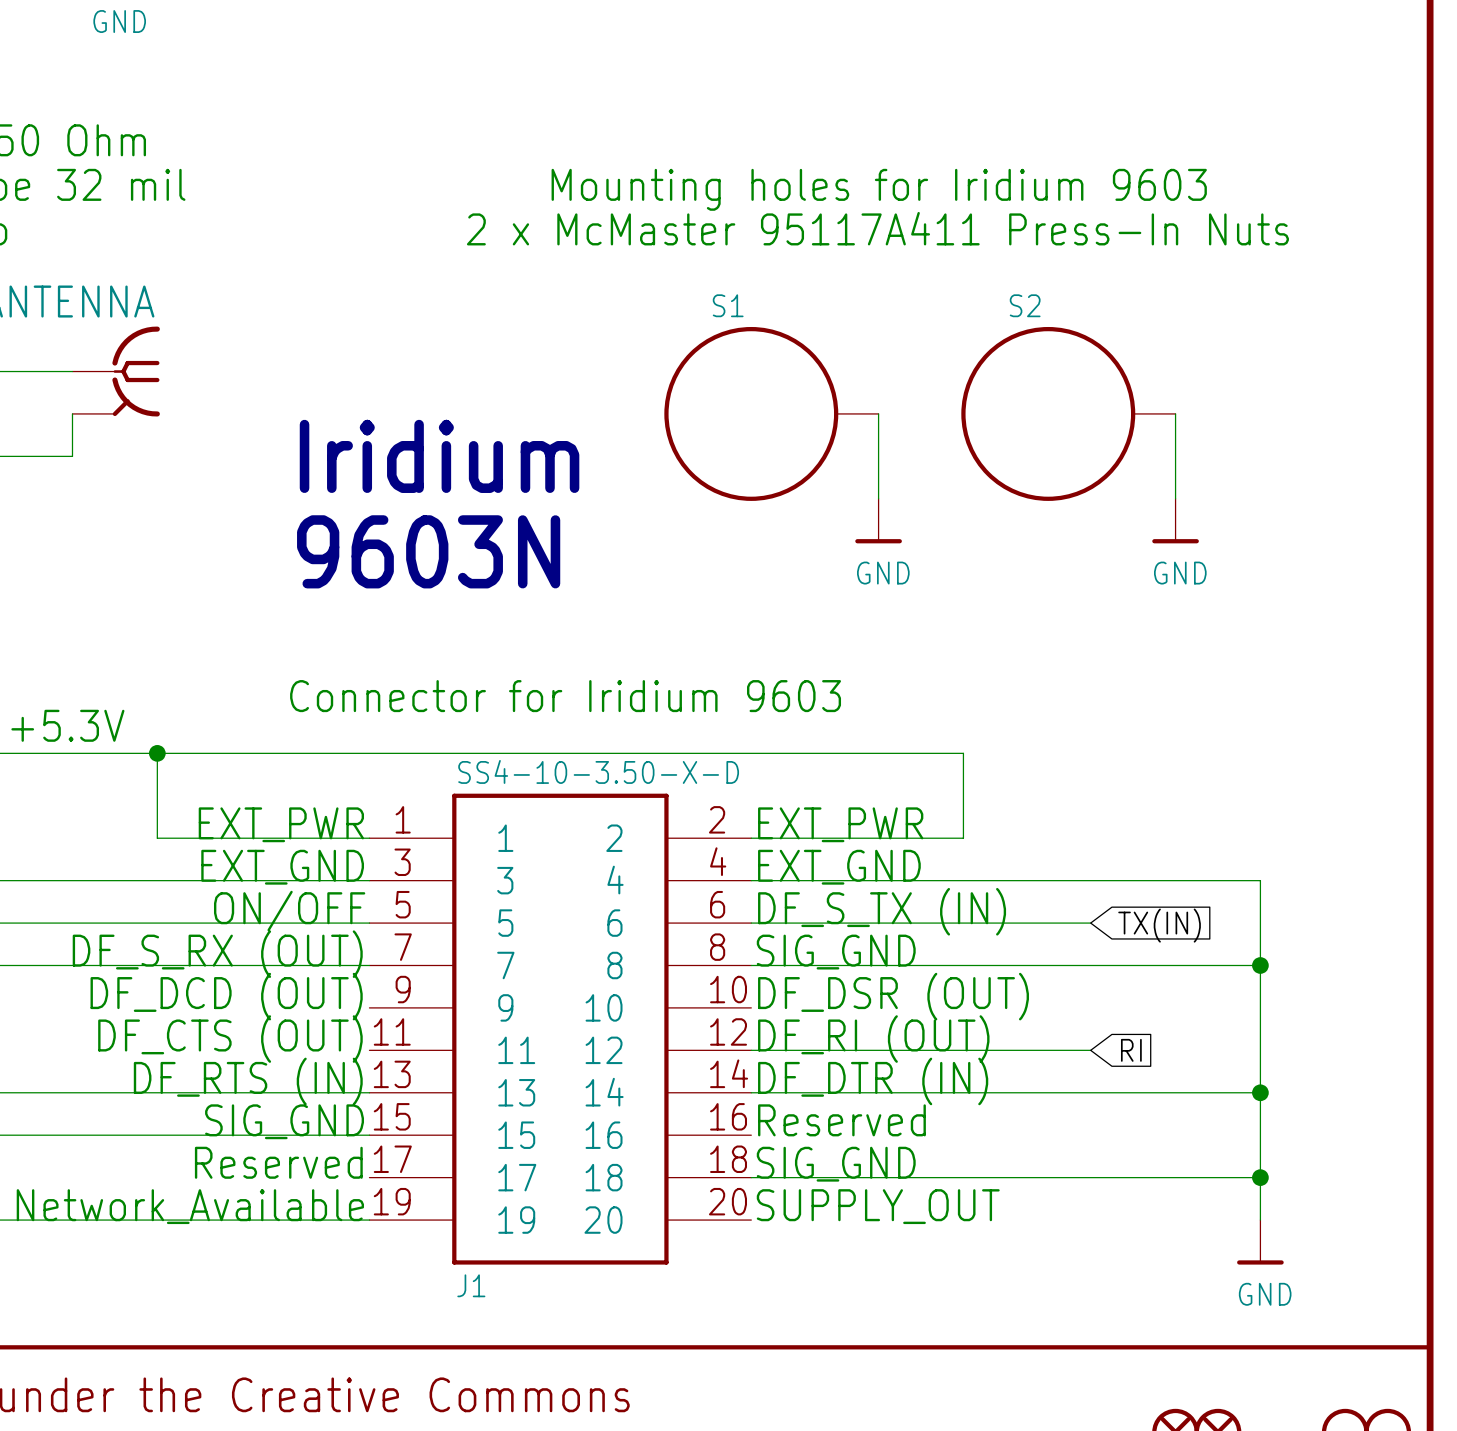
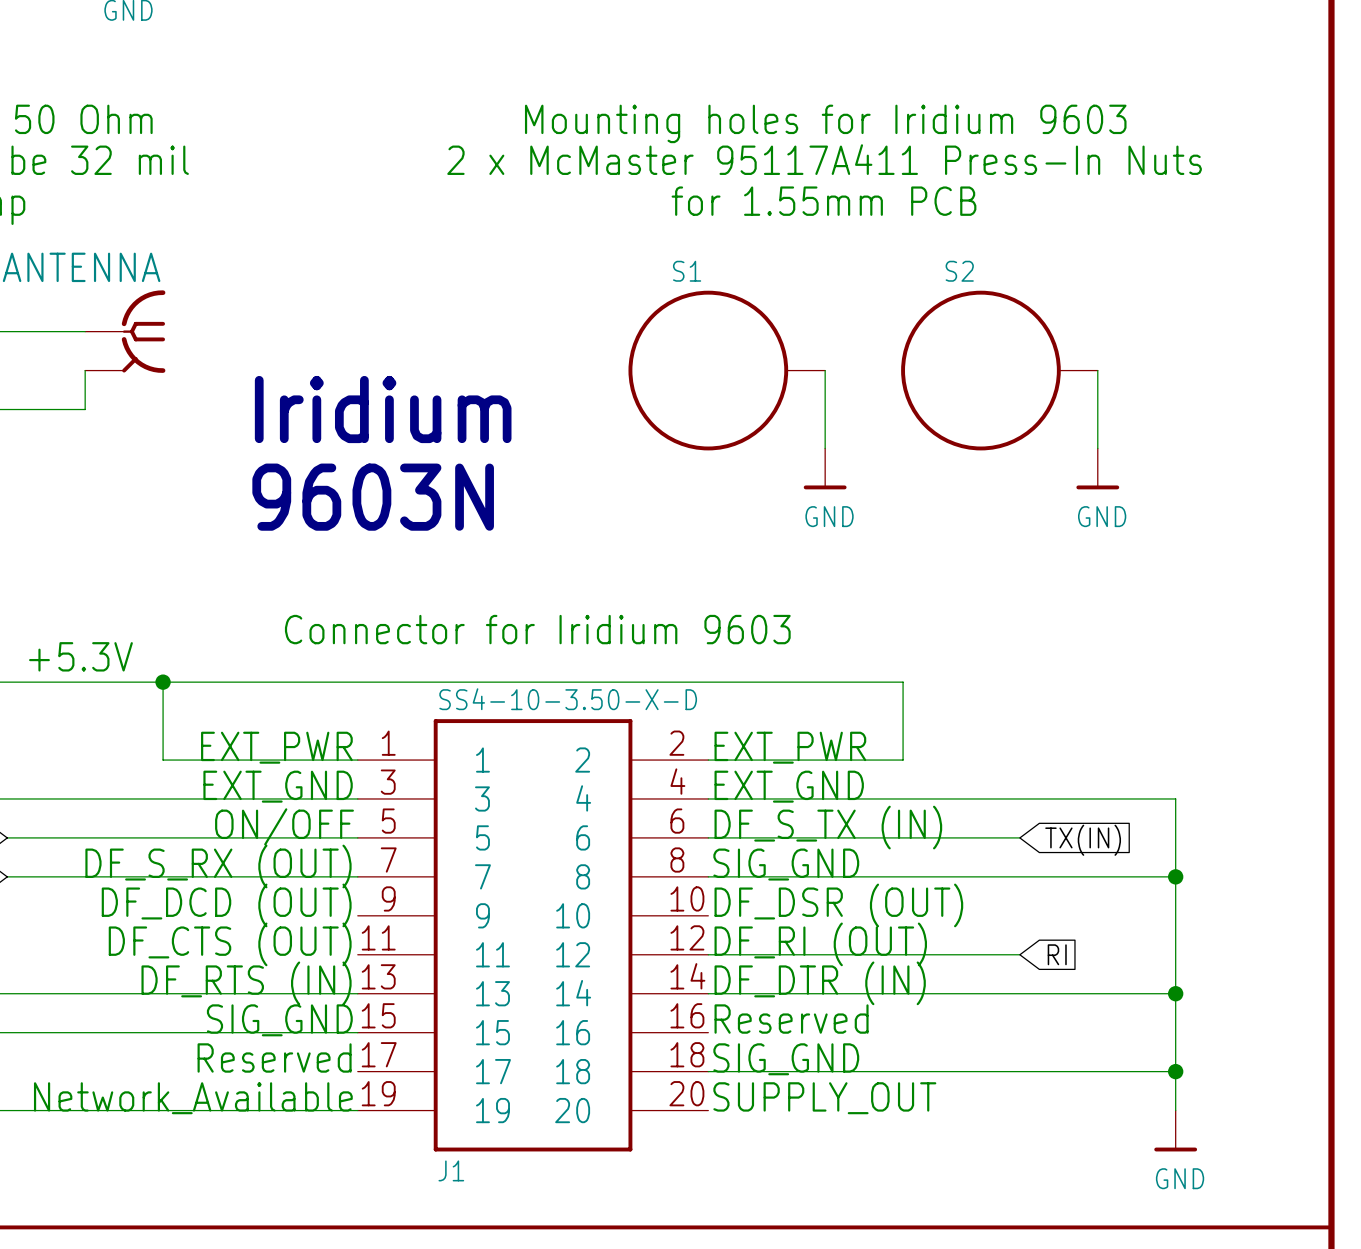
text: none -> Mounting holes for Iridium 9603 (825, 123)
text: Mounting holes for Iridium 9603 (879, 189) -> 2 x McMaster 95117A411 Press-In Nuts (824, 159)
text: 2 x McMaster 95117A411 Press-In Nuts (877, 228) -> for 1.55mm PCB (823, 201)
text position: Iridium (439, 456) -> Iridium (383, 409)
text position: 9603N (428, 551) -> 9603N (373, 497)

